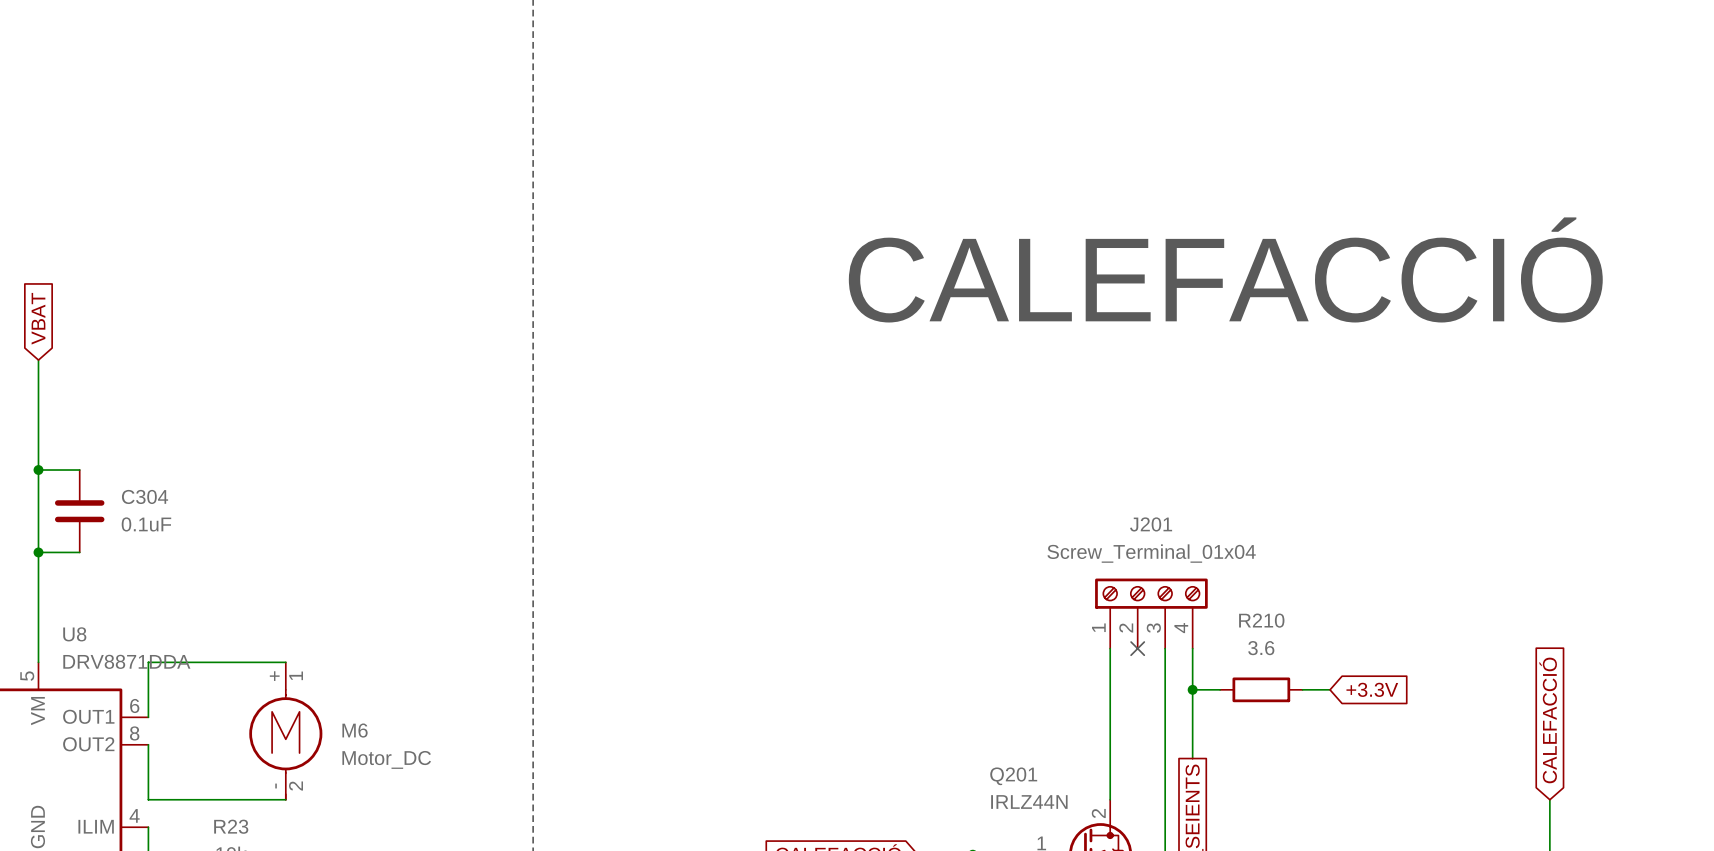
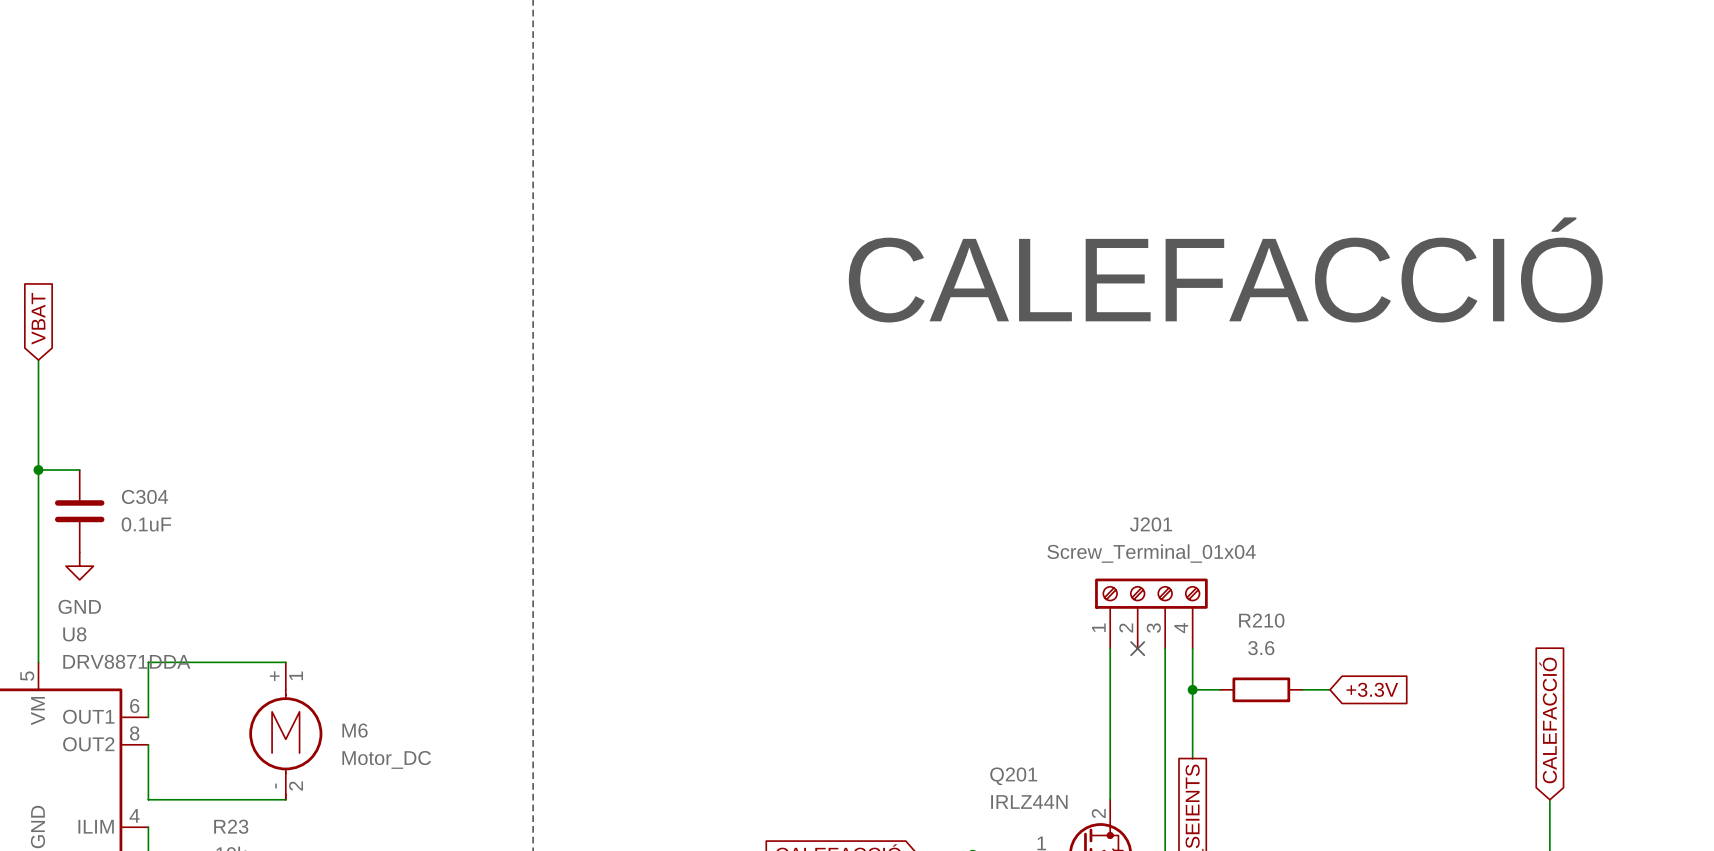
wire: (38, 552) (79, 552) -> none
junction: (38, 552) -> none
power symbol: none -> GND (79, 566)

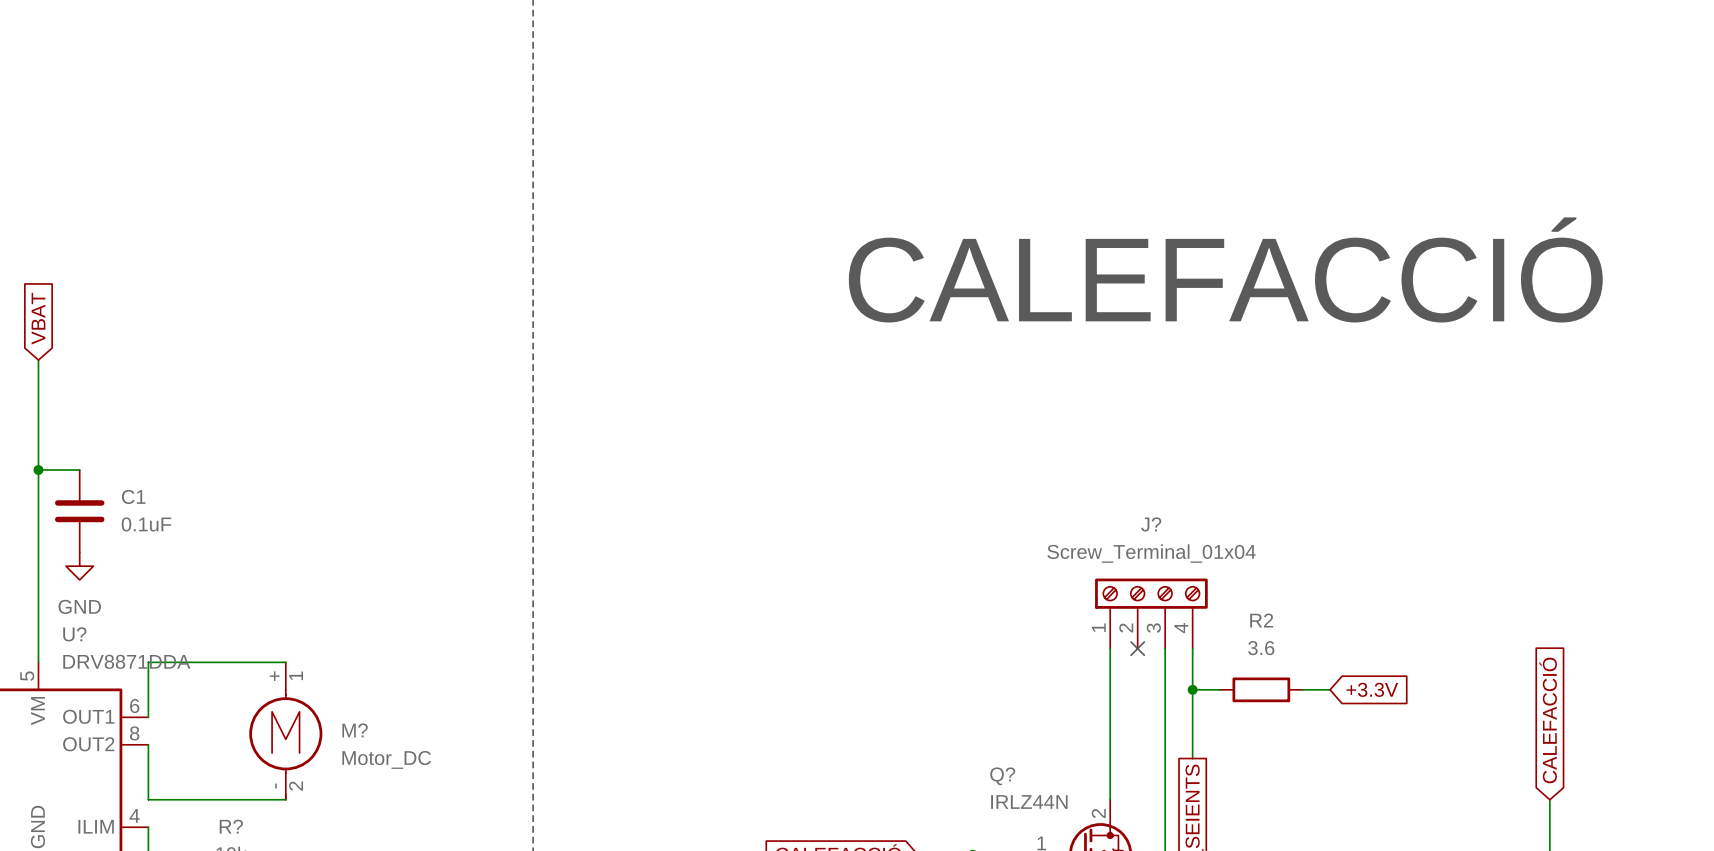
C304 name: C304 (145, 496) -> C1 (133, 496)
J201 name: J201 (1151, 524) -> J? (1151, 524)
R210 name: R210 (1261, 620) -> R2 (1261, 620)
U8 name: U8 (74, 634) -> U? (74, 634)
M6 name: M6 (355, 730) -> M? (355, 730)
Q201 name: Q201 (1013, 776) -> Q? (1002, 776)
R23 name: R23 (231, 826) -> R? (231, 826)

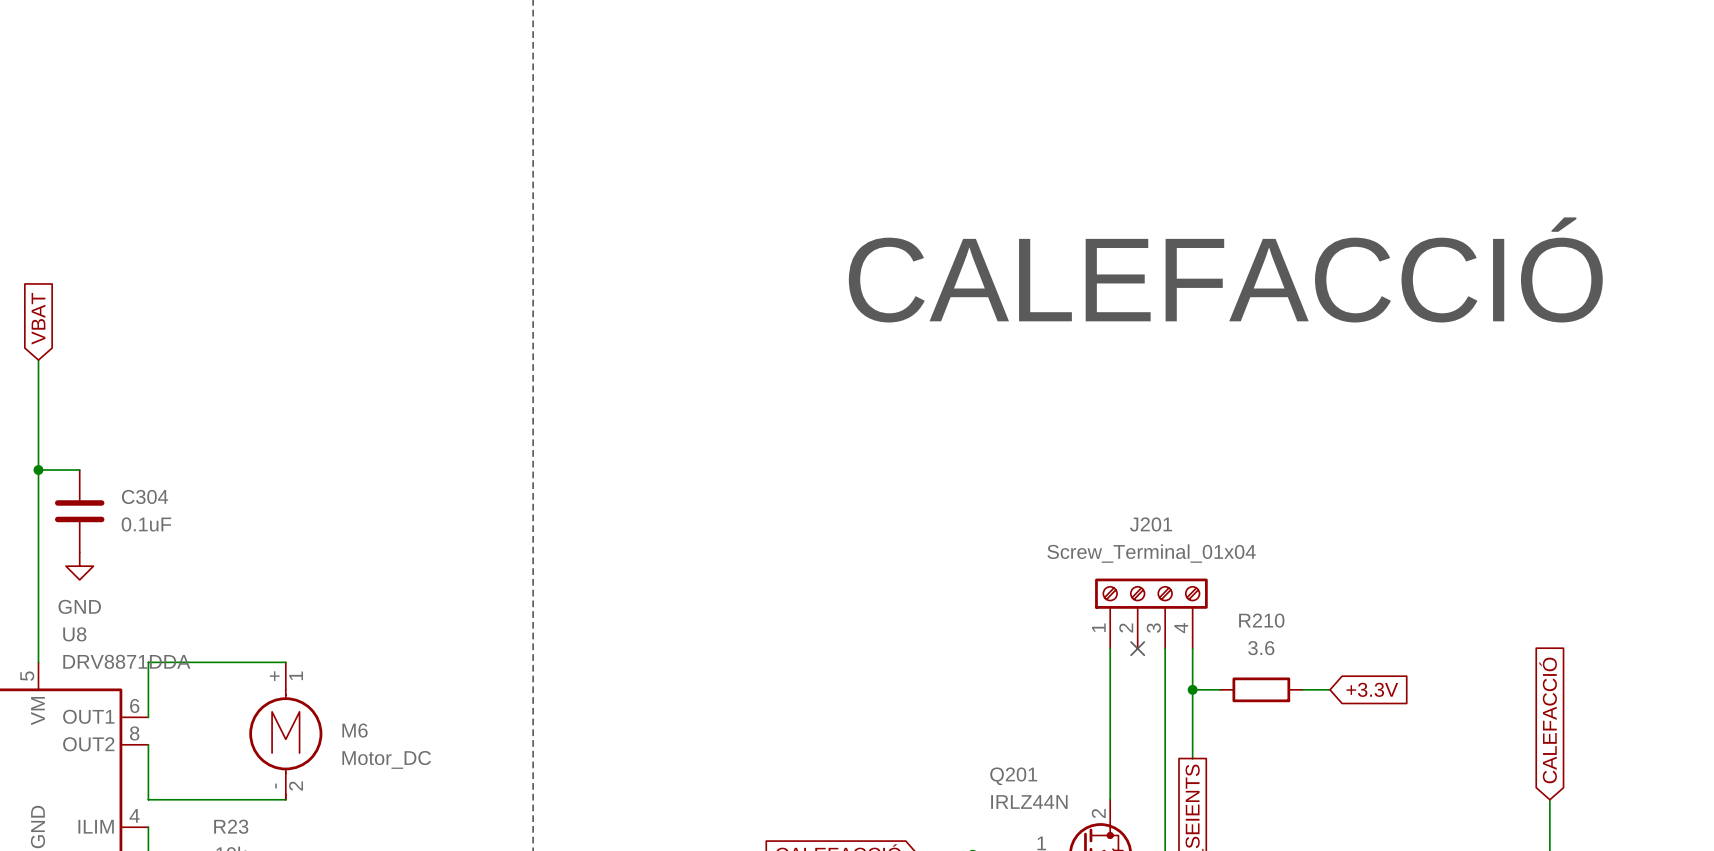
C1 name: C1 (133, 496) -> C304 (145, 496)
J? name: J? (1151, 524) -> J201 (1151, 524)
R2 name: R2 (1261, 620) -> R210 (1261, 620)
U? name: U? (74, 634) -> U8 (74, 634)
M? name: M? (355, 730) -> M6 (355, 730)
Q? name: Q? (1002, 776) -> Q201 (1013, 776)
R? name: R? (231, 826) -> R23 (231, 826)

